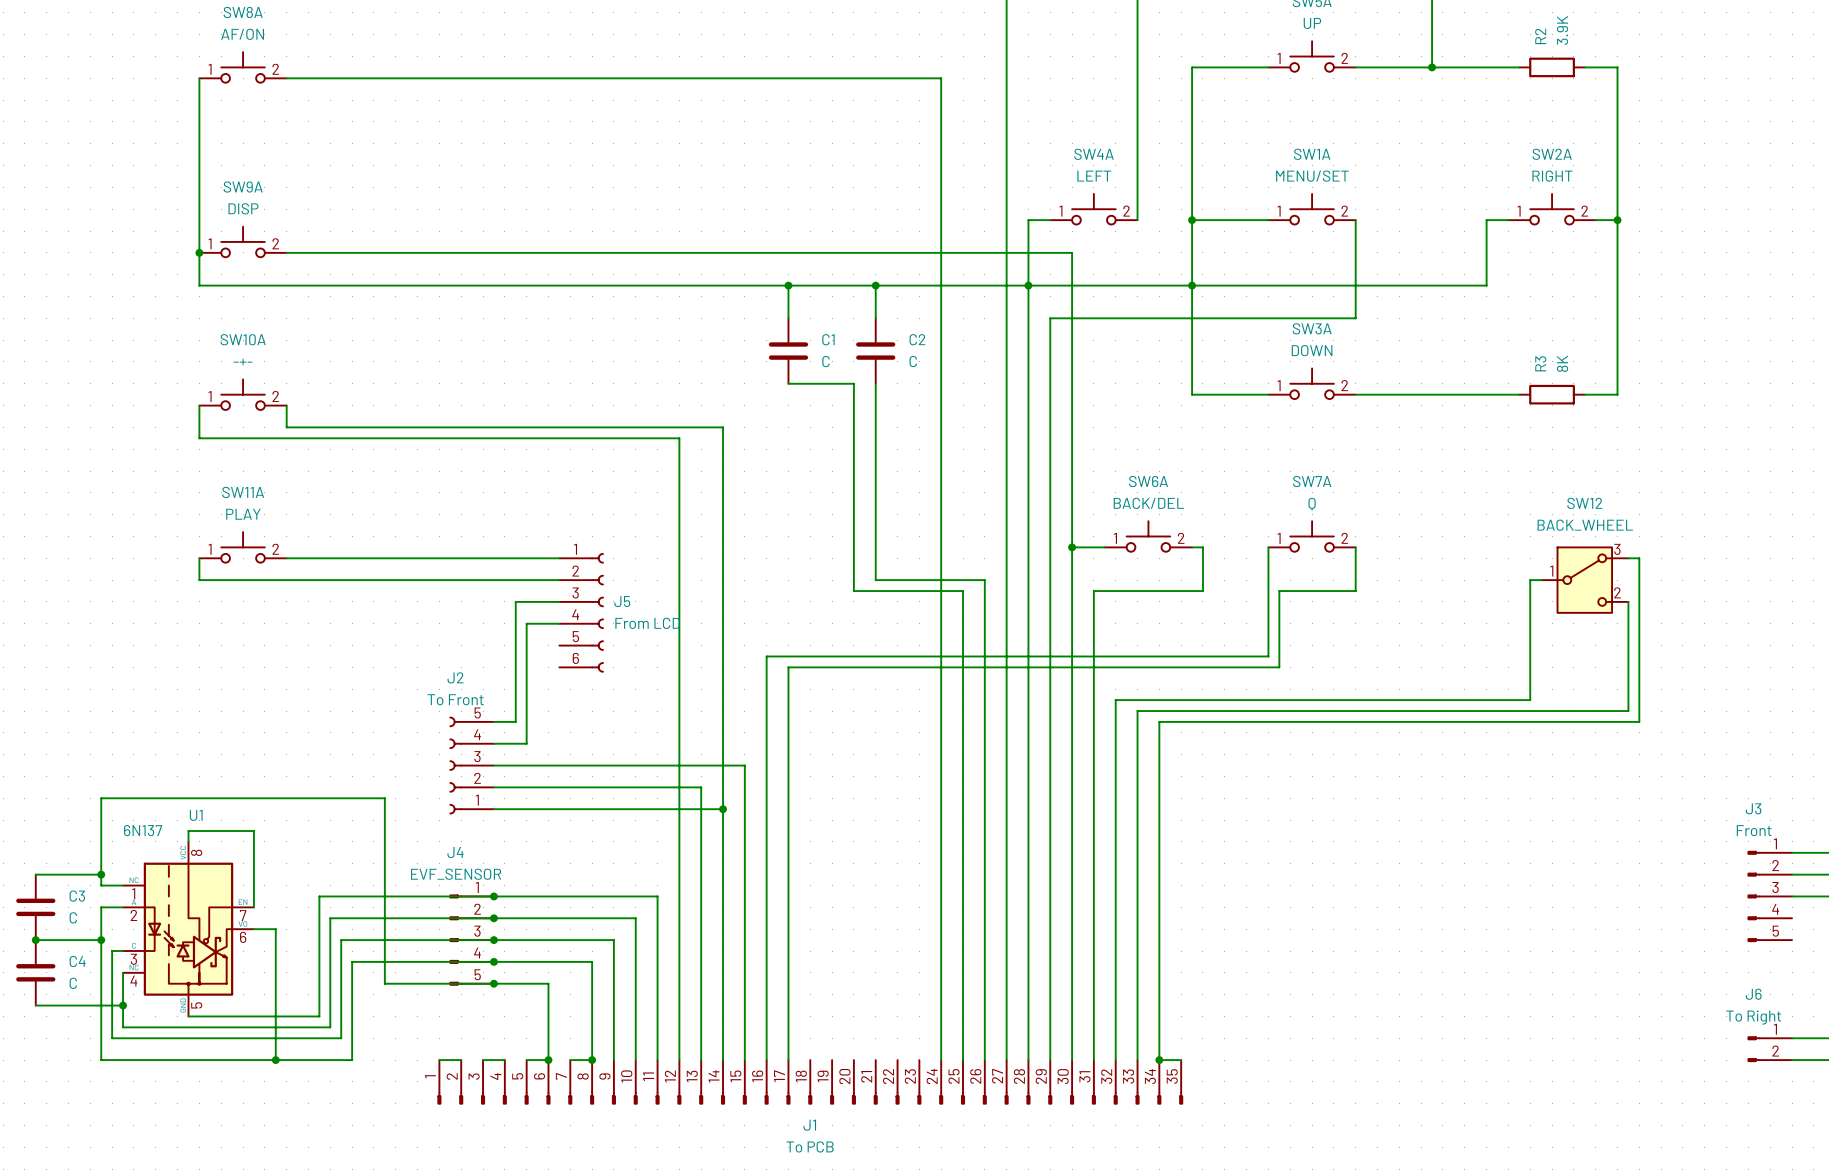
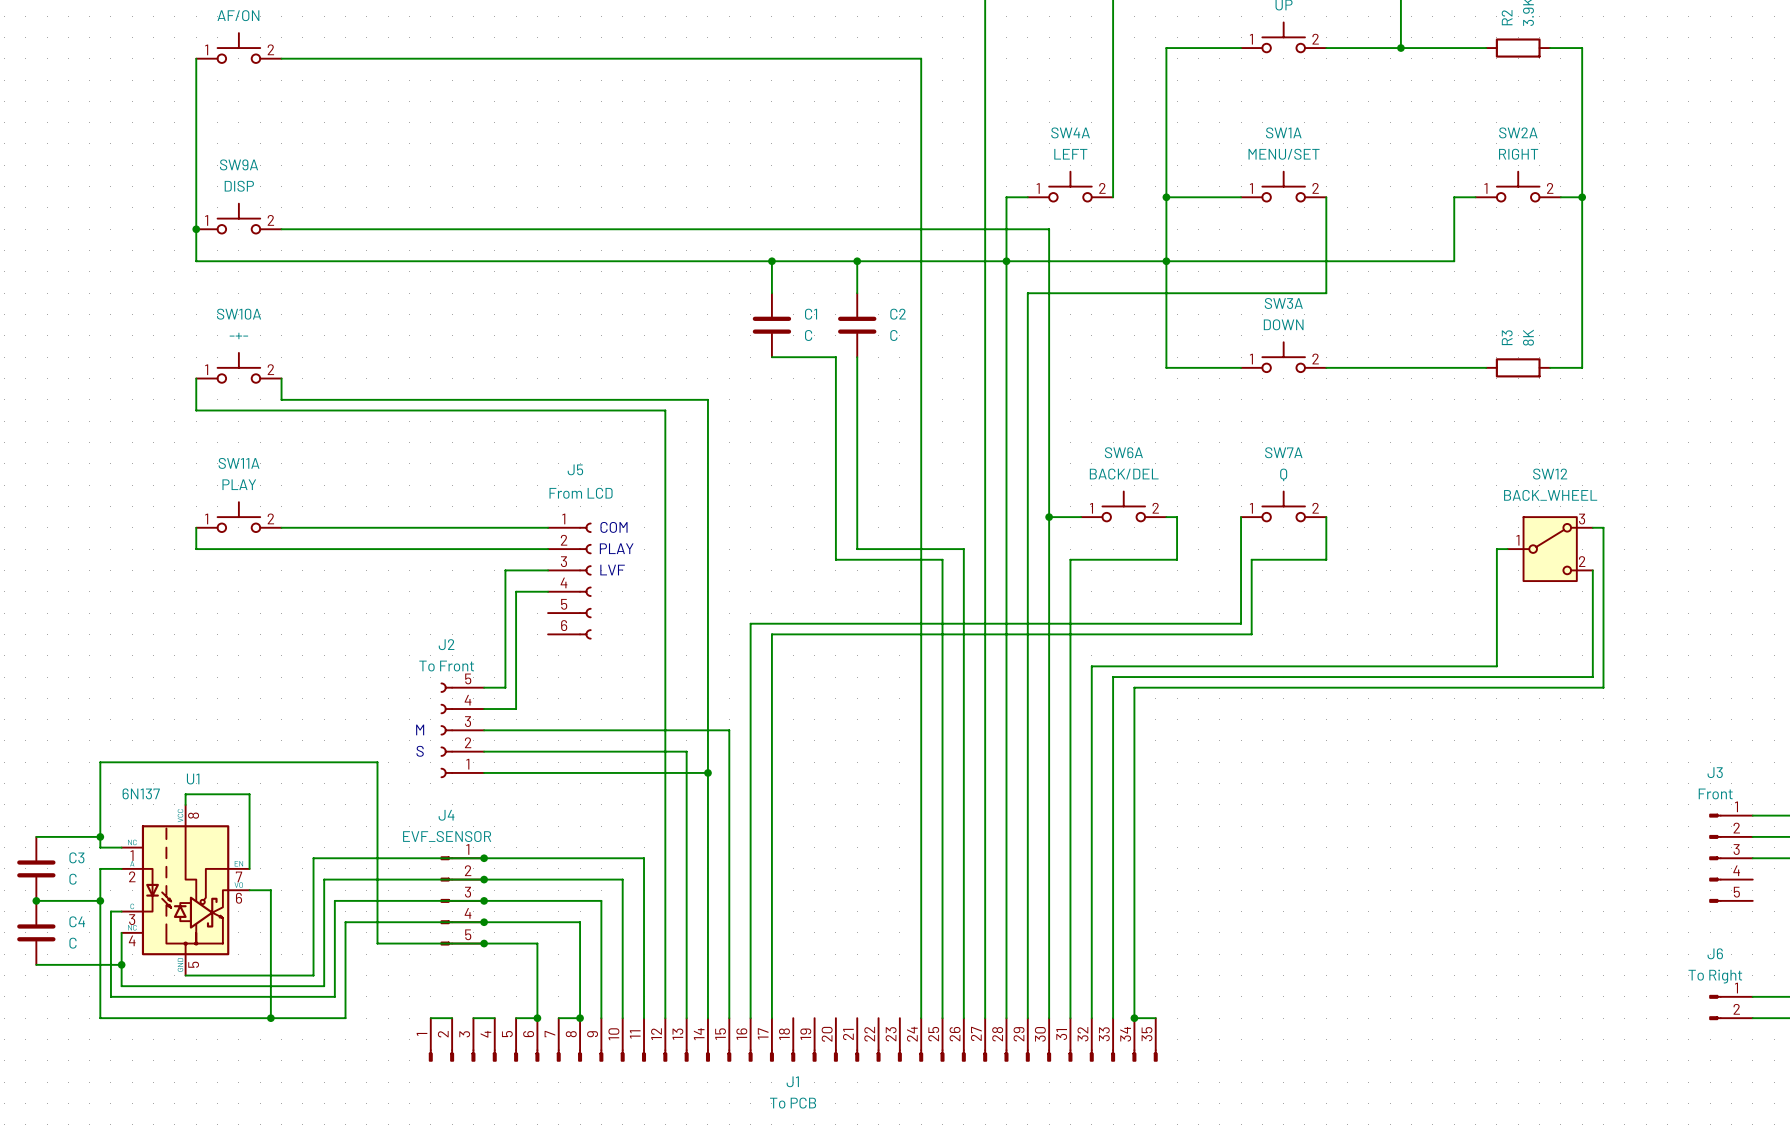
text: none -> COM (614, 527)
text: none -> PLAY (616, 548)
J5 name position: J5 (622, 601) -> J5 (575, 469)
text: none -> LVF (612, 570)
J5 value position: From LCD (647, 623) -> From LCD (581, 493)
text: none -> M (420, 729)
text: none -> S (420, 751)

